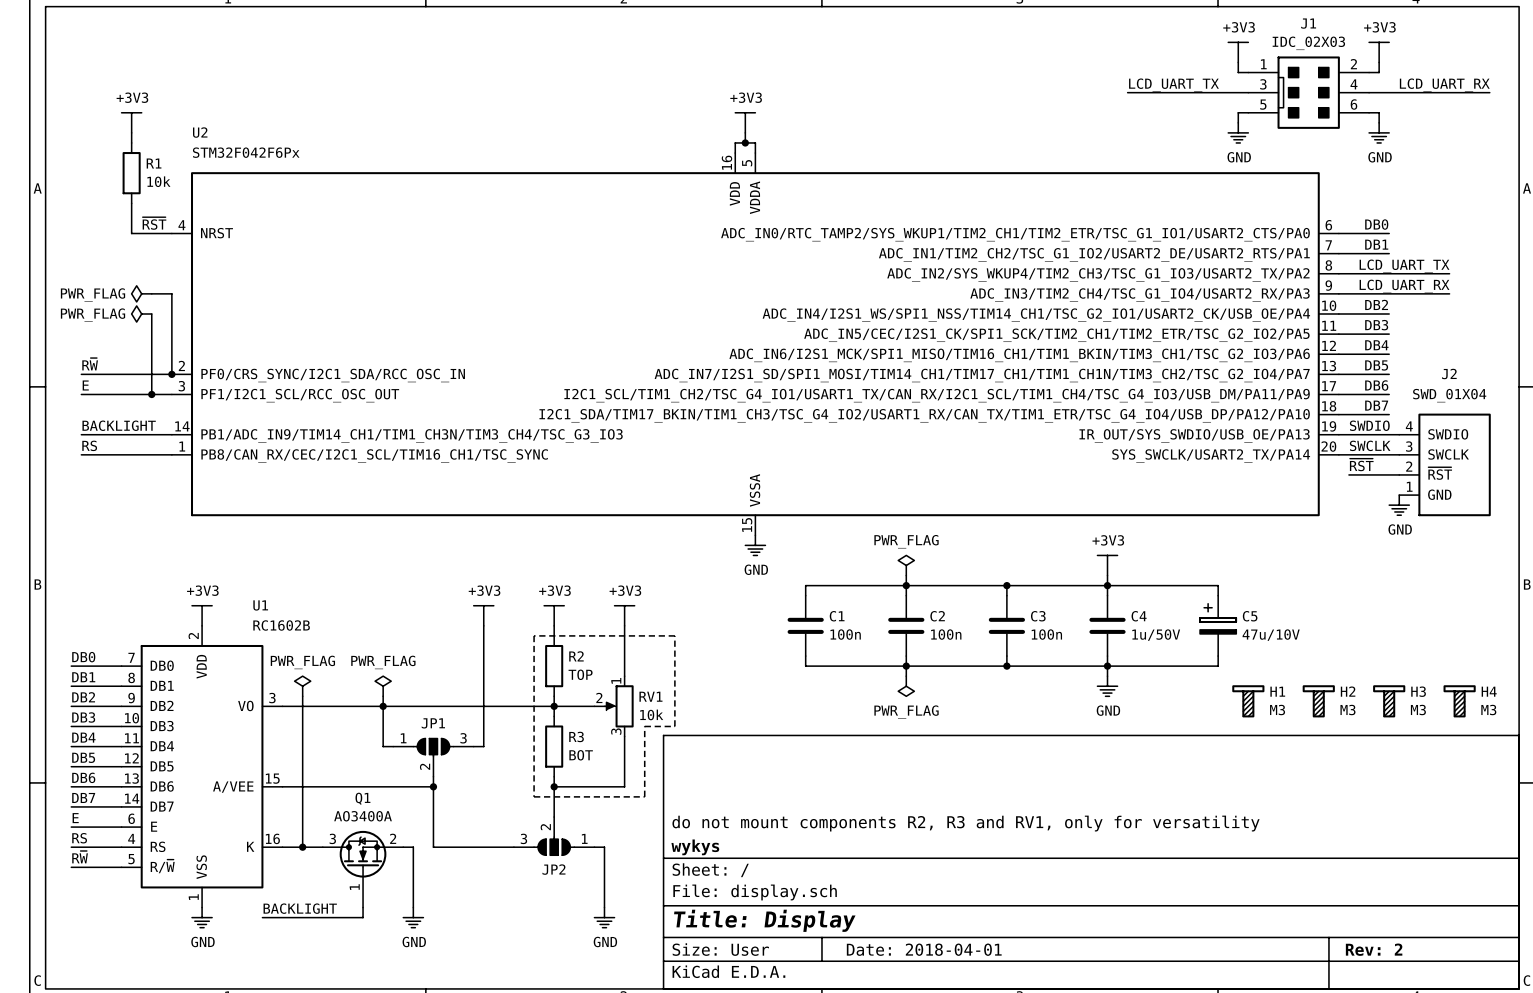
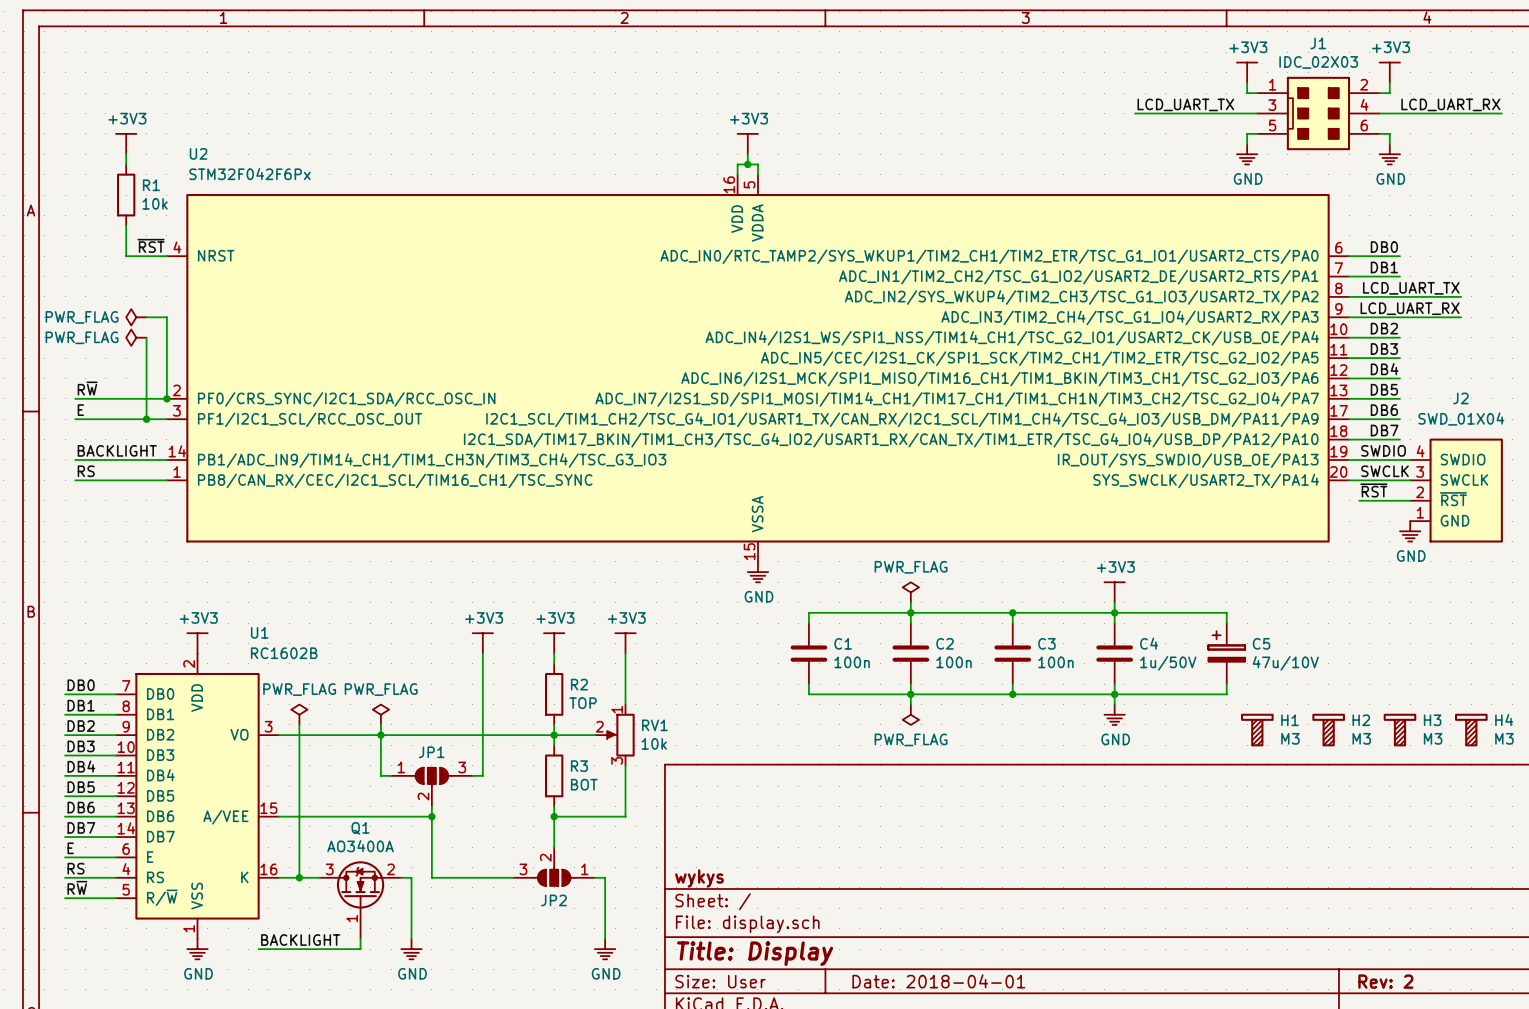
line: (534, 635) (674, 635) (674, 726) (644, 726) (644, 796) (534, 796) (534, 635) -> none
title block: do not mount components R2, R3 and RV1, only for versatility (966, 823) -> none

